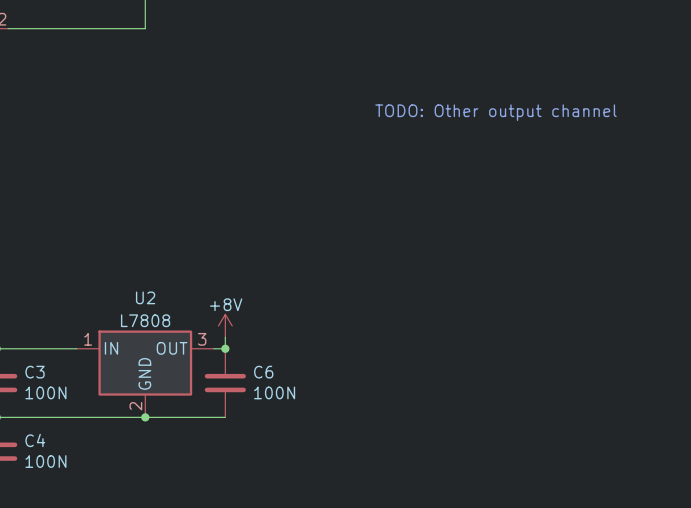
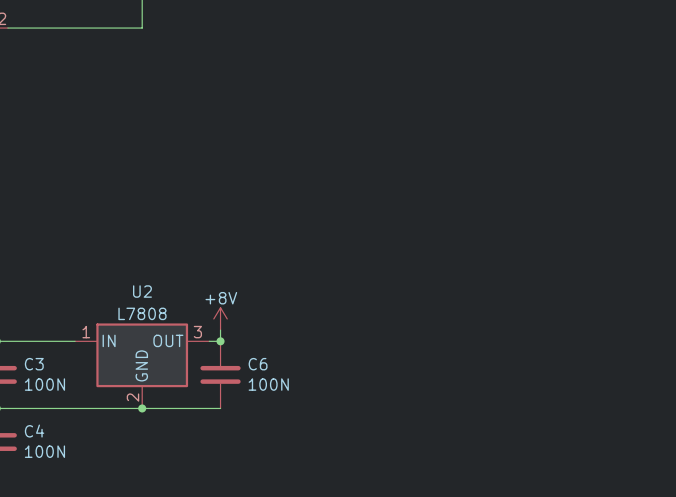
text: TODO: Other output channel (496, 112) -> none

